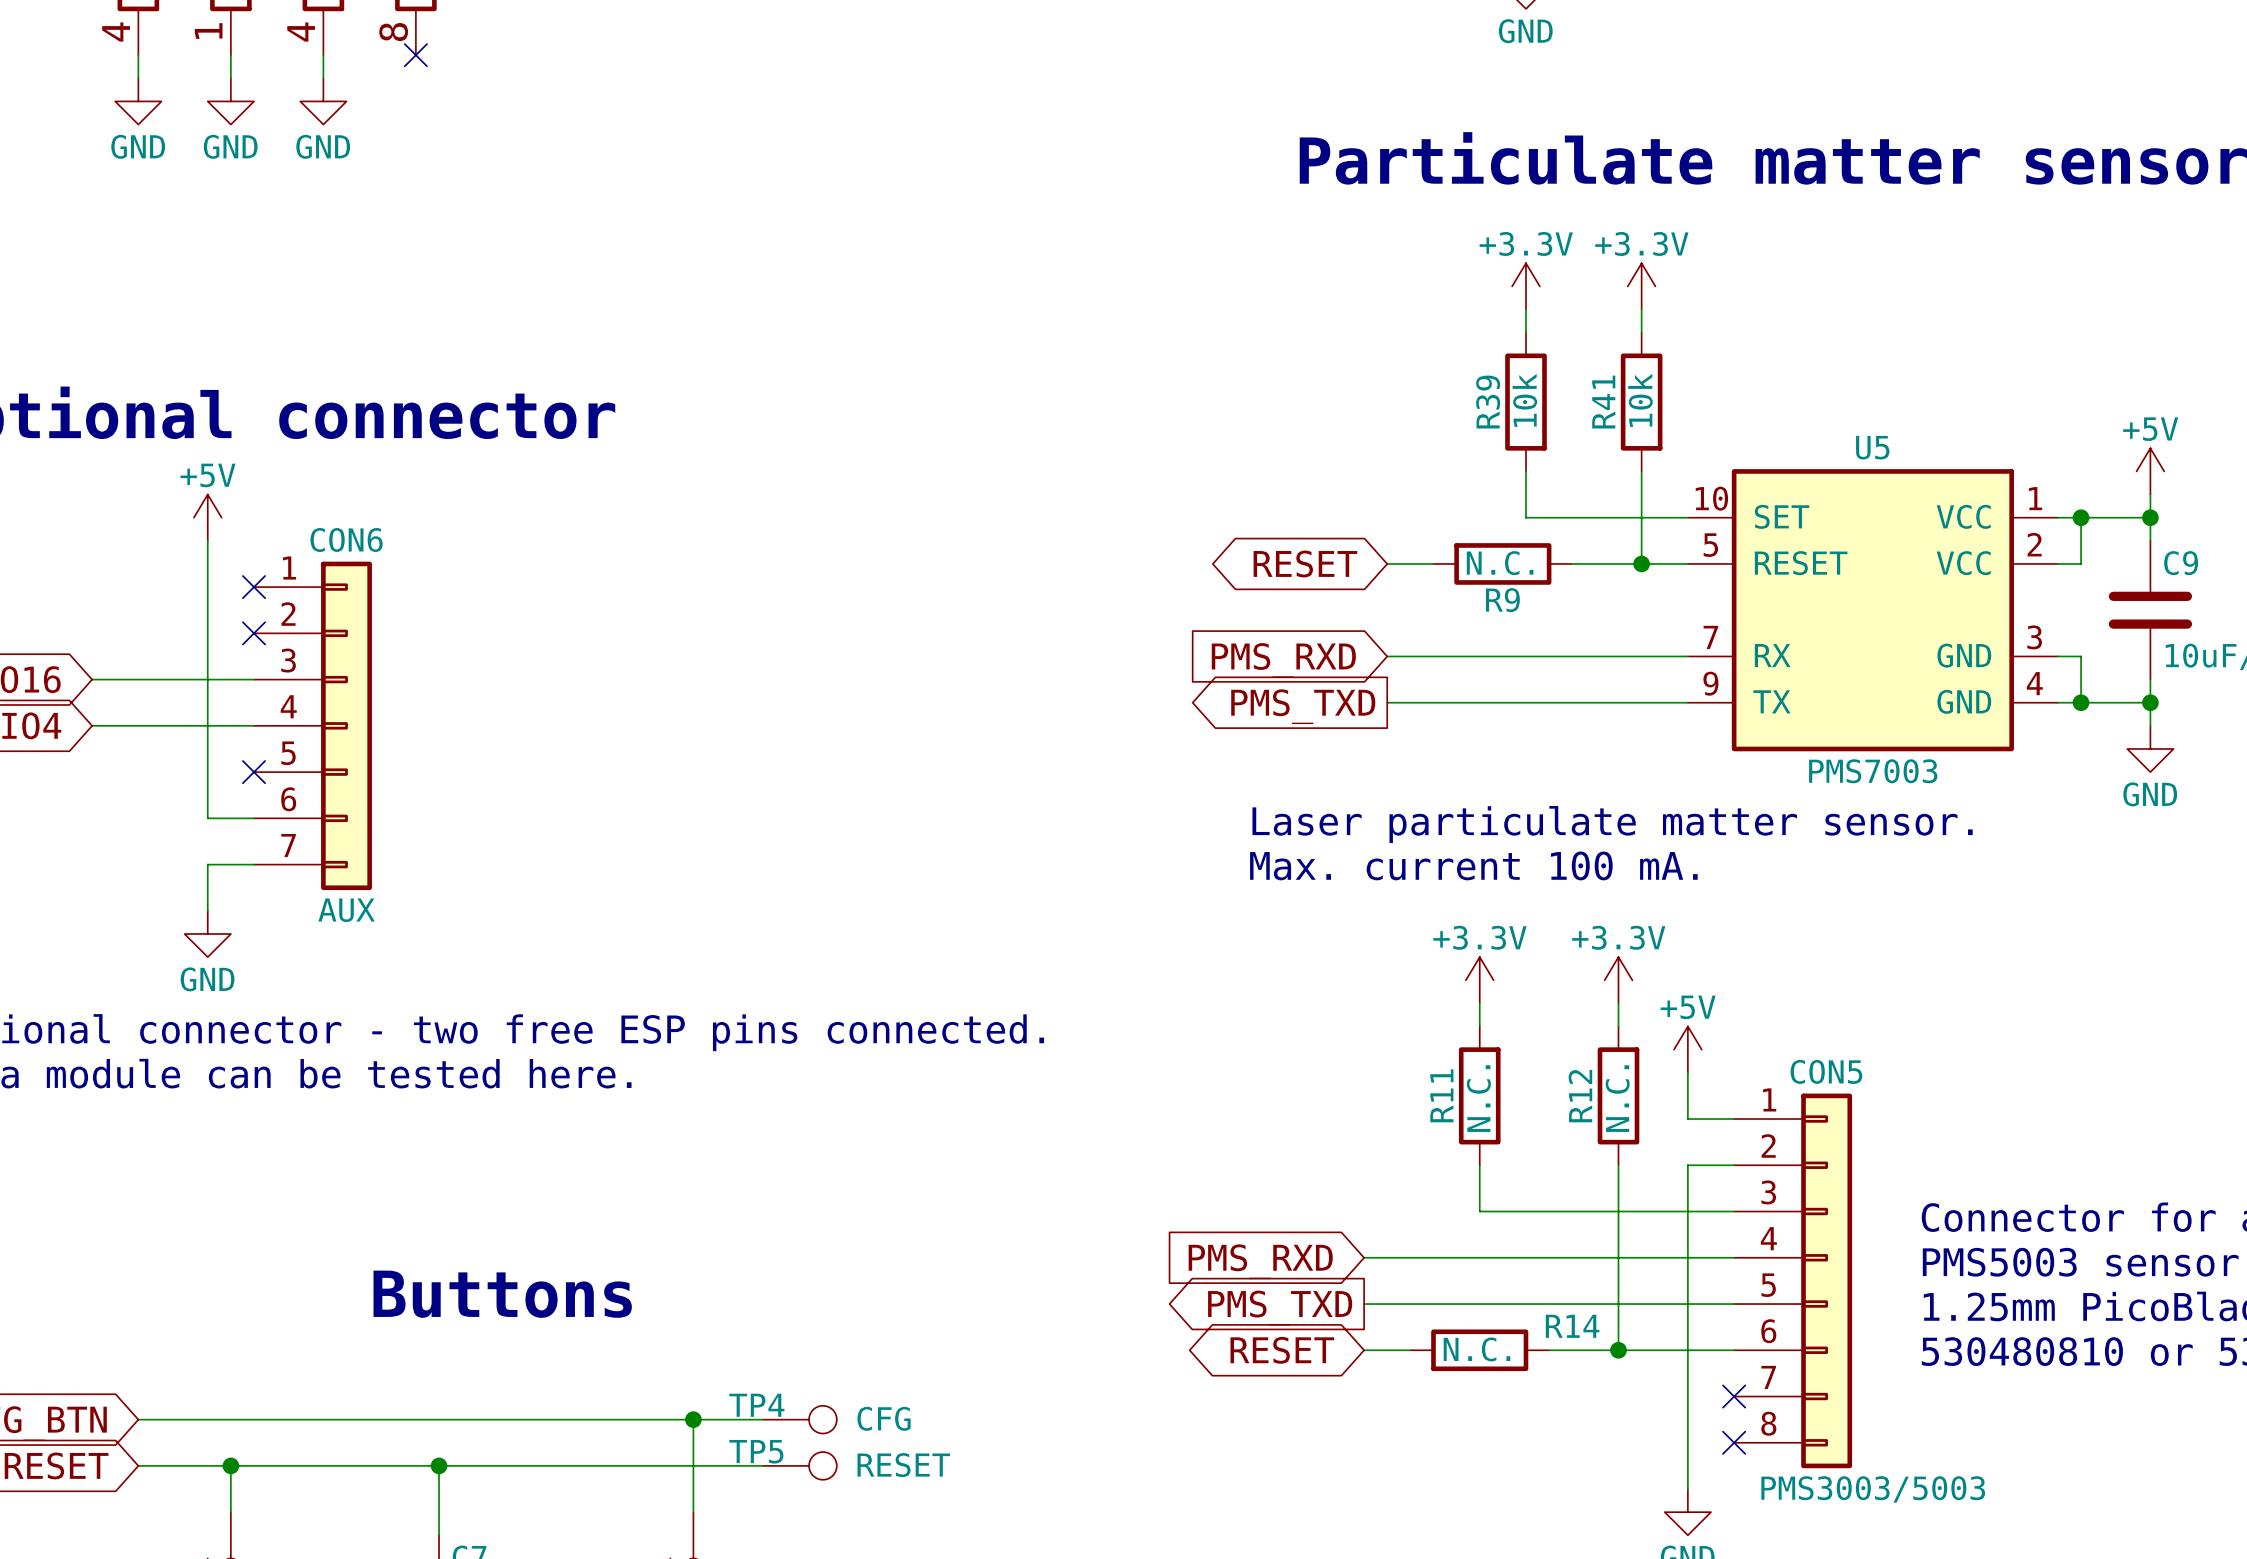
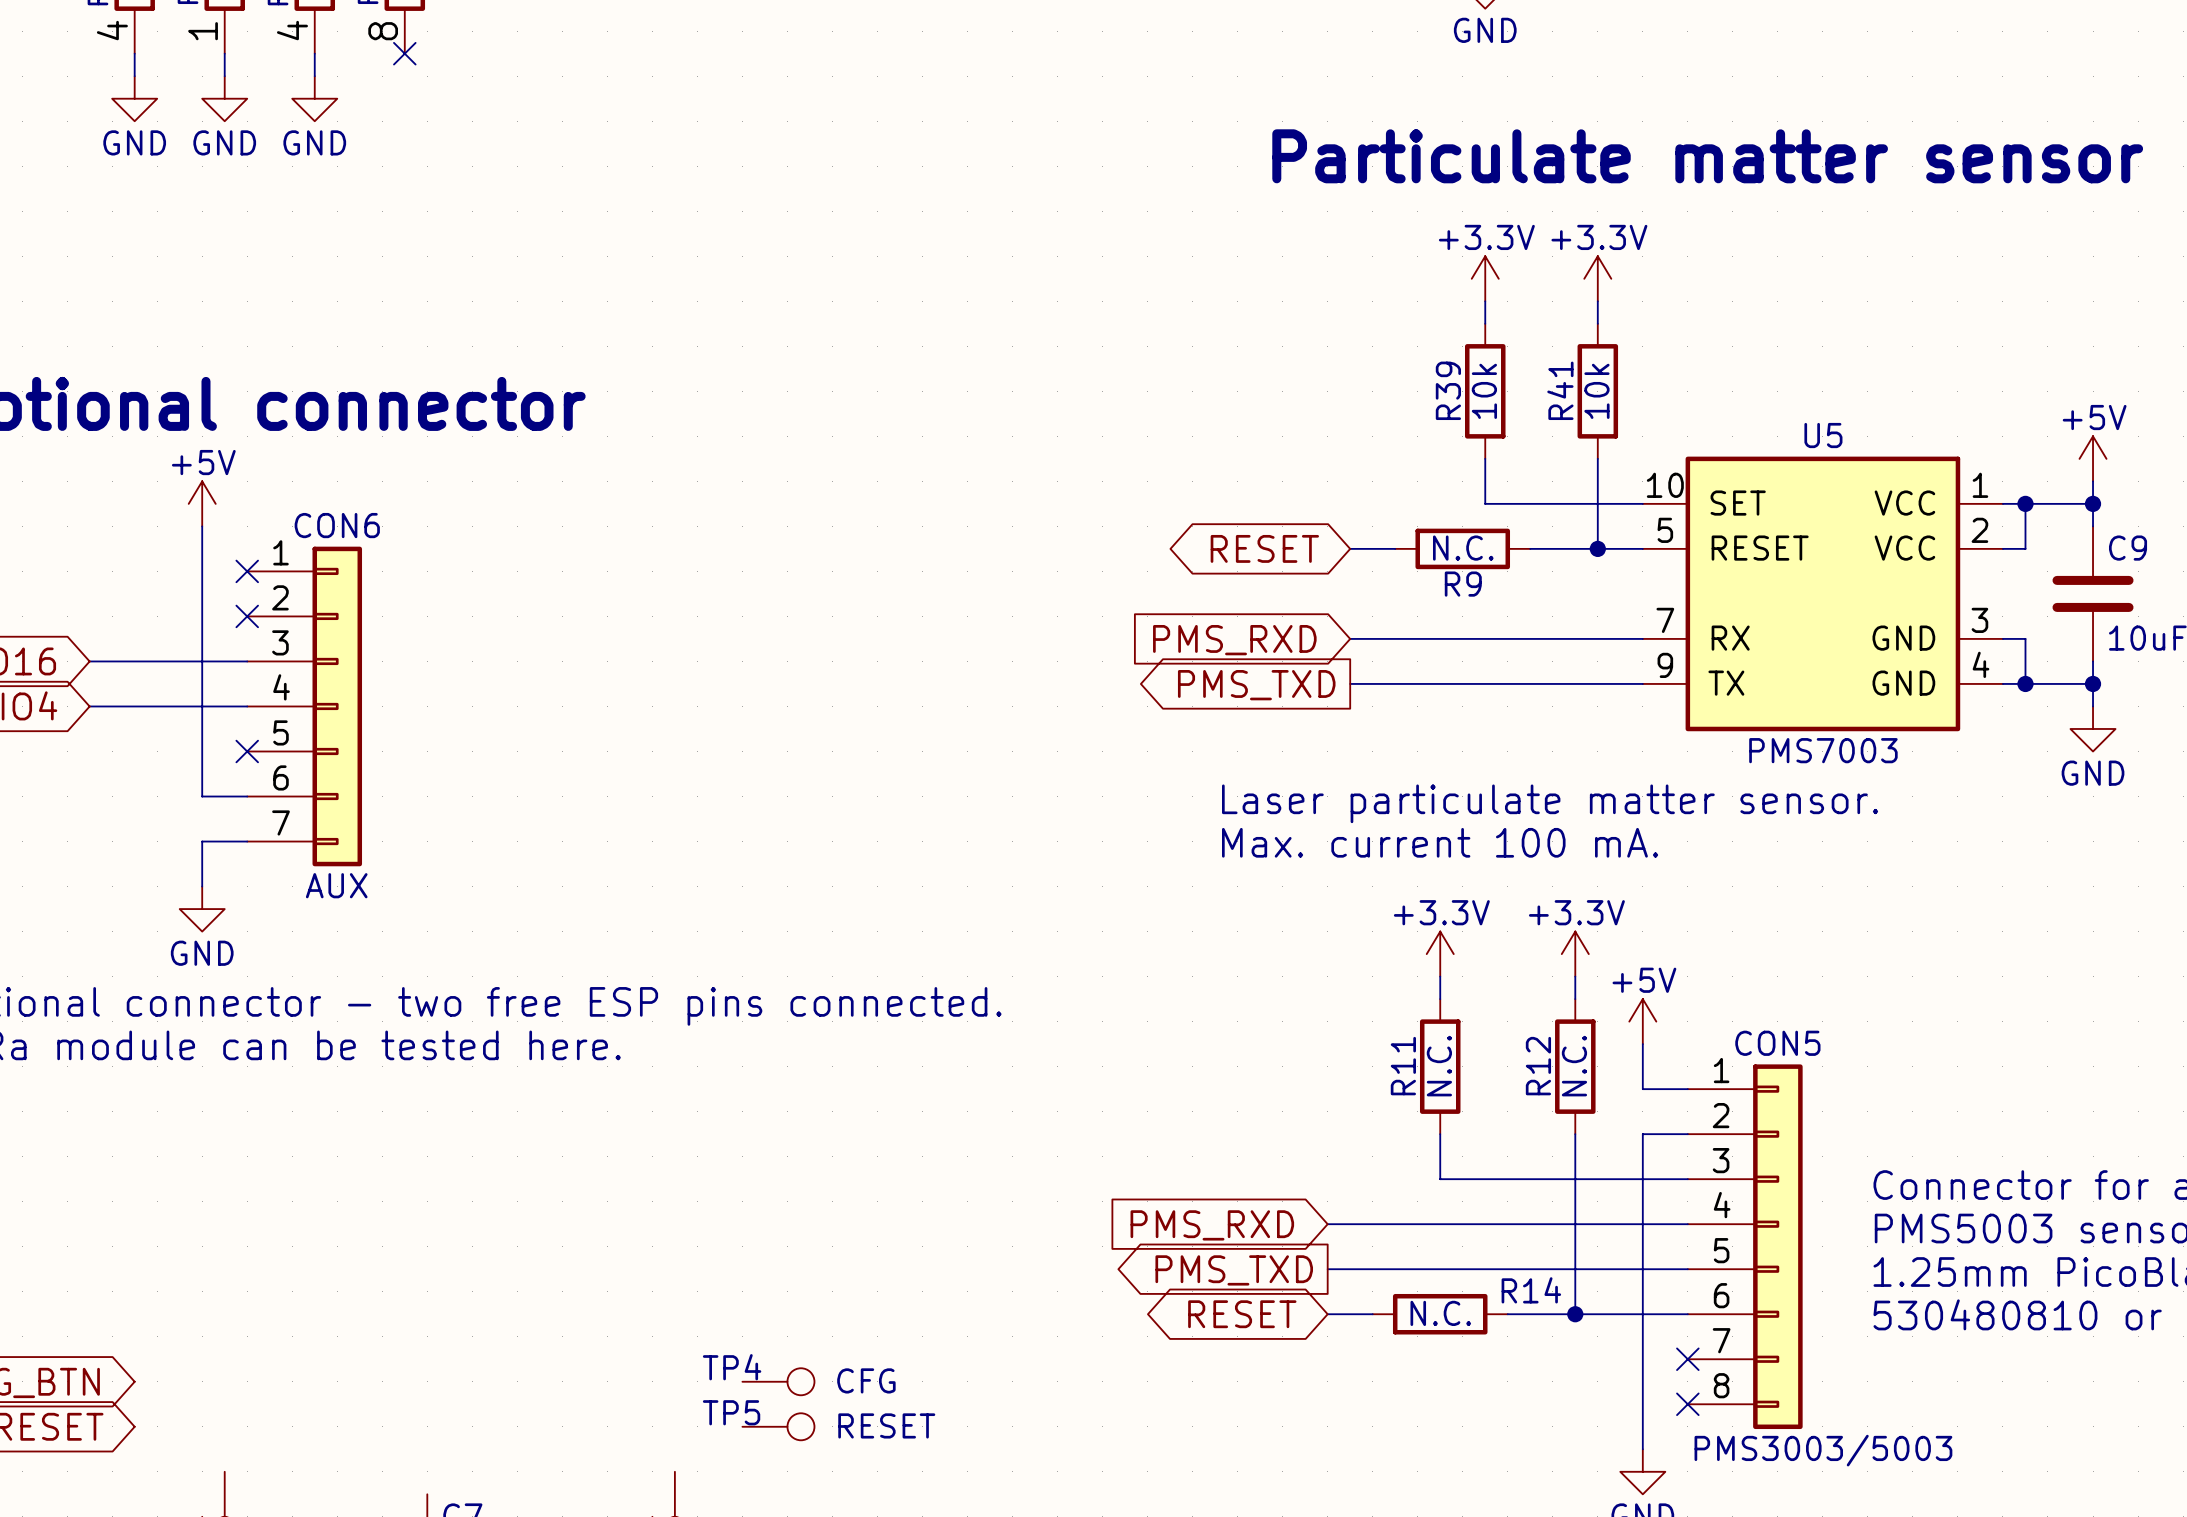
text: Buttons (502, 1294) -> none
wire: (138, 1419) (762, 1419) -> none
wire: (693, 1419) (693, 1512) -> none
junction: (693, 1419) -> none
wire: (138, 1465) (762, 1465) -> none
wire: (230, 1465) (230, 1512) -> none
junction: (230, 1465) -> none
wire: (439, 1465) (439, 1535) -> none
junction: (439, 1465) -> none

